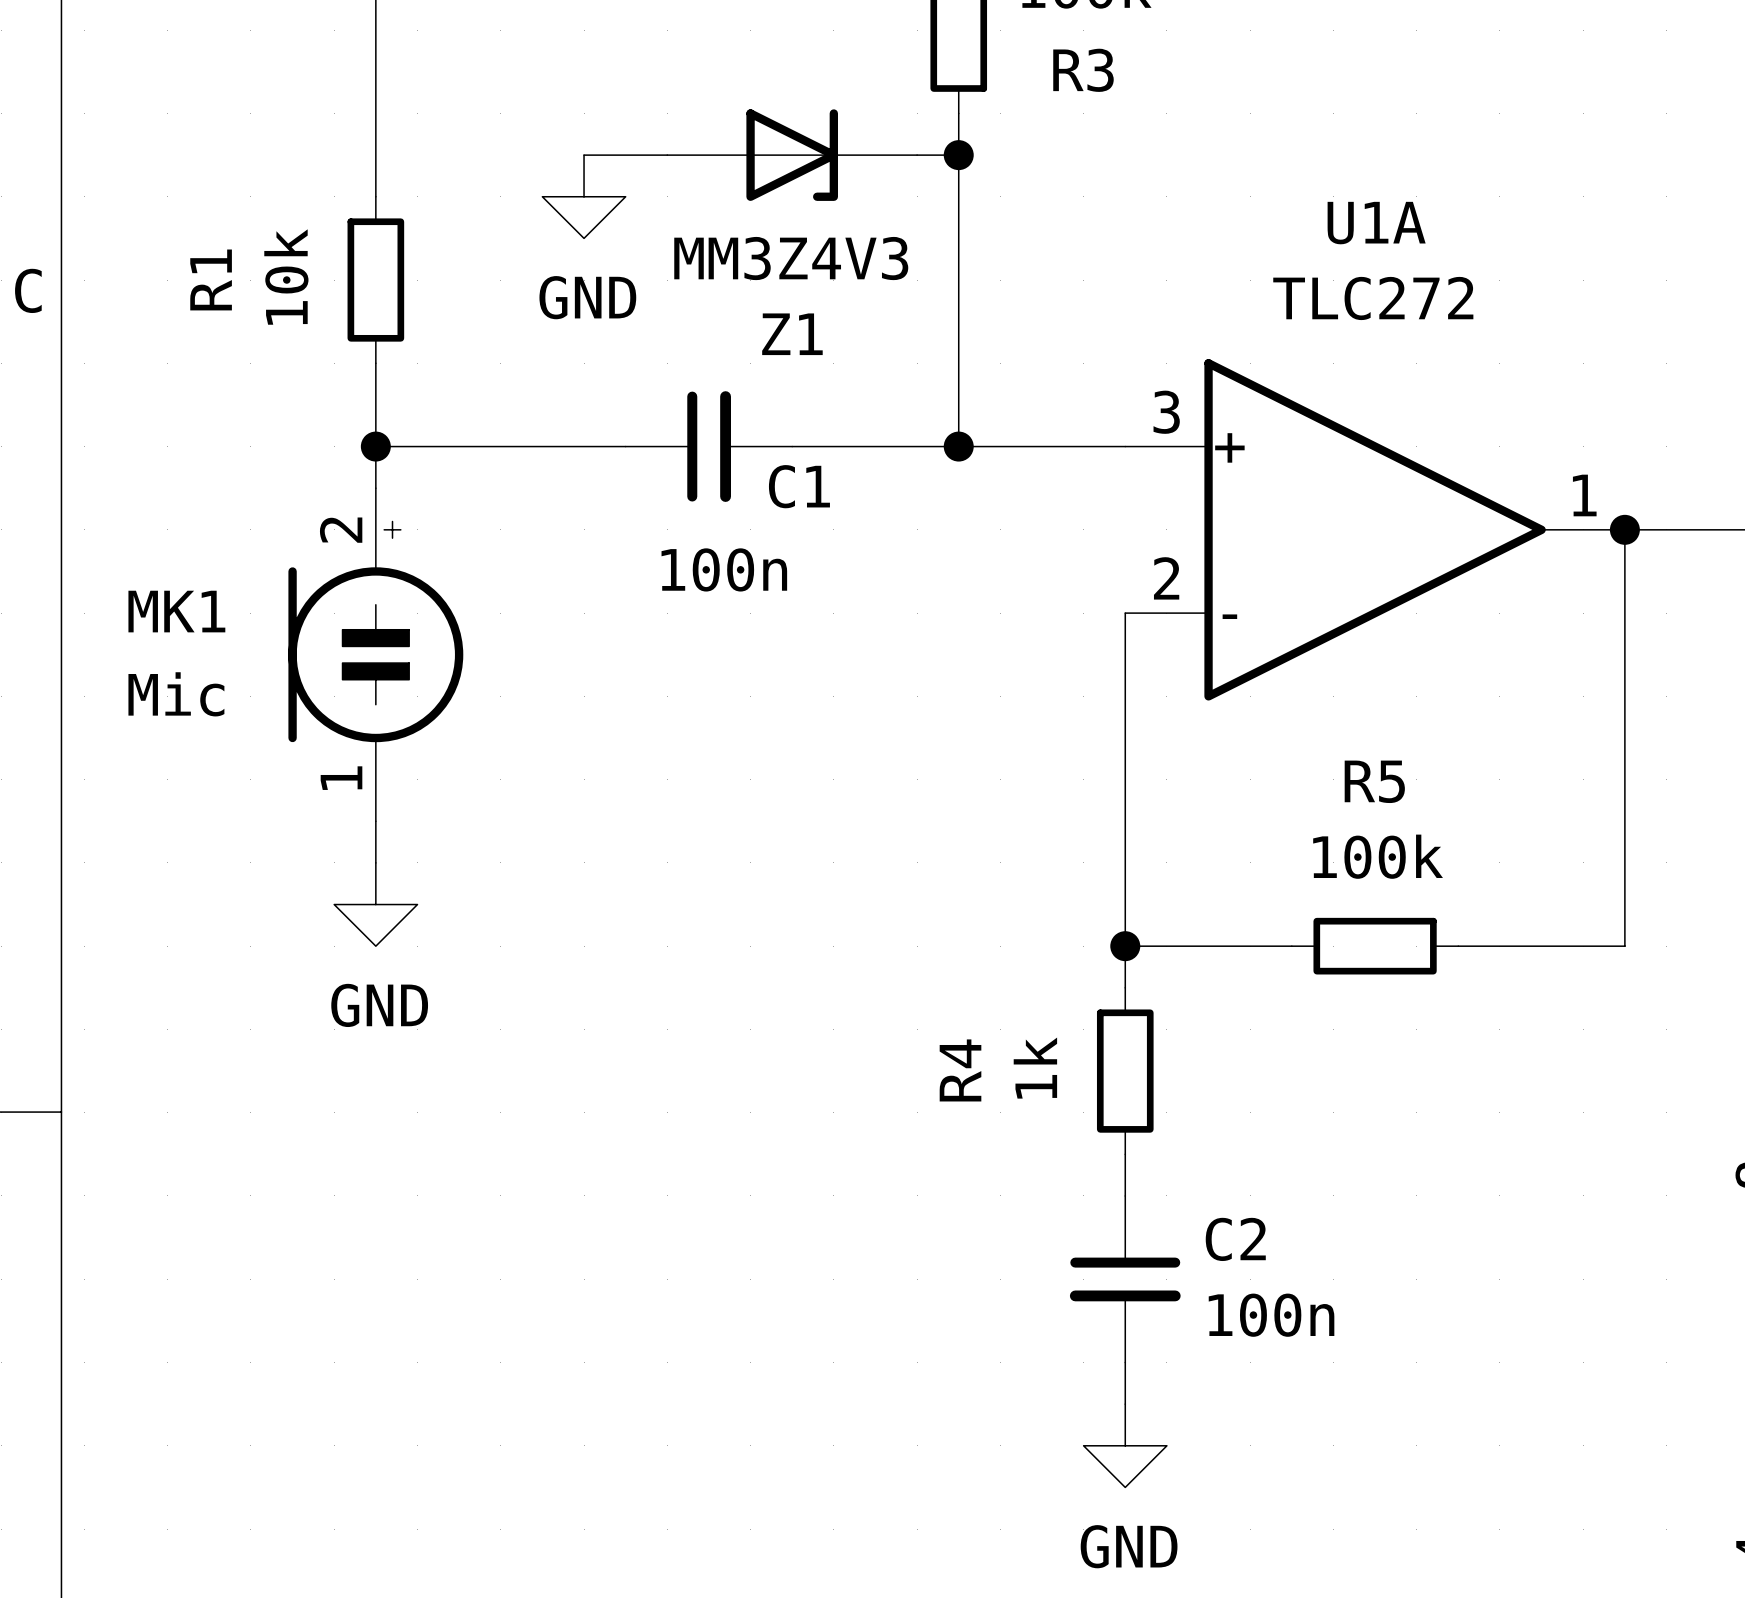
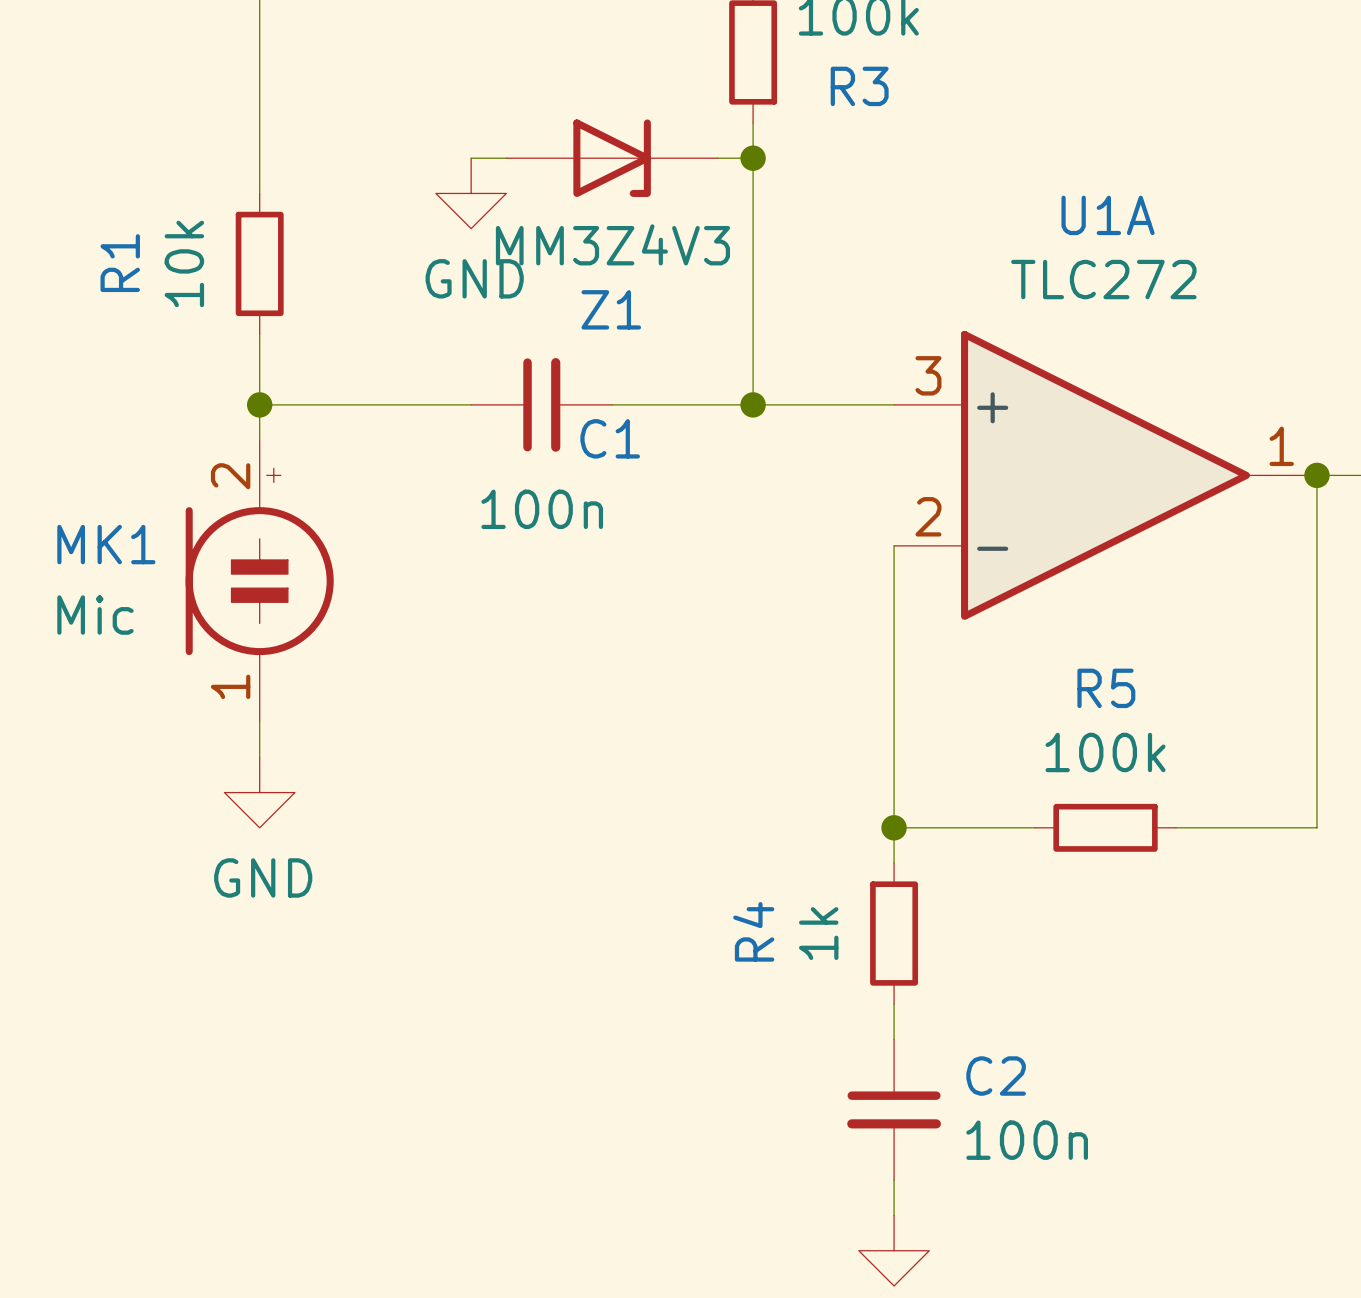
wire: (584, 155) (625, 155) -> none
power symbol position: GND (584, 196) -> GND (471, 193)

